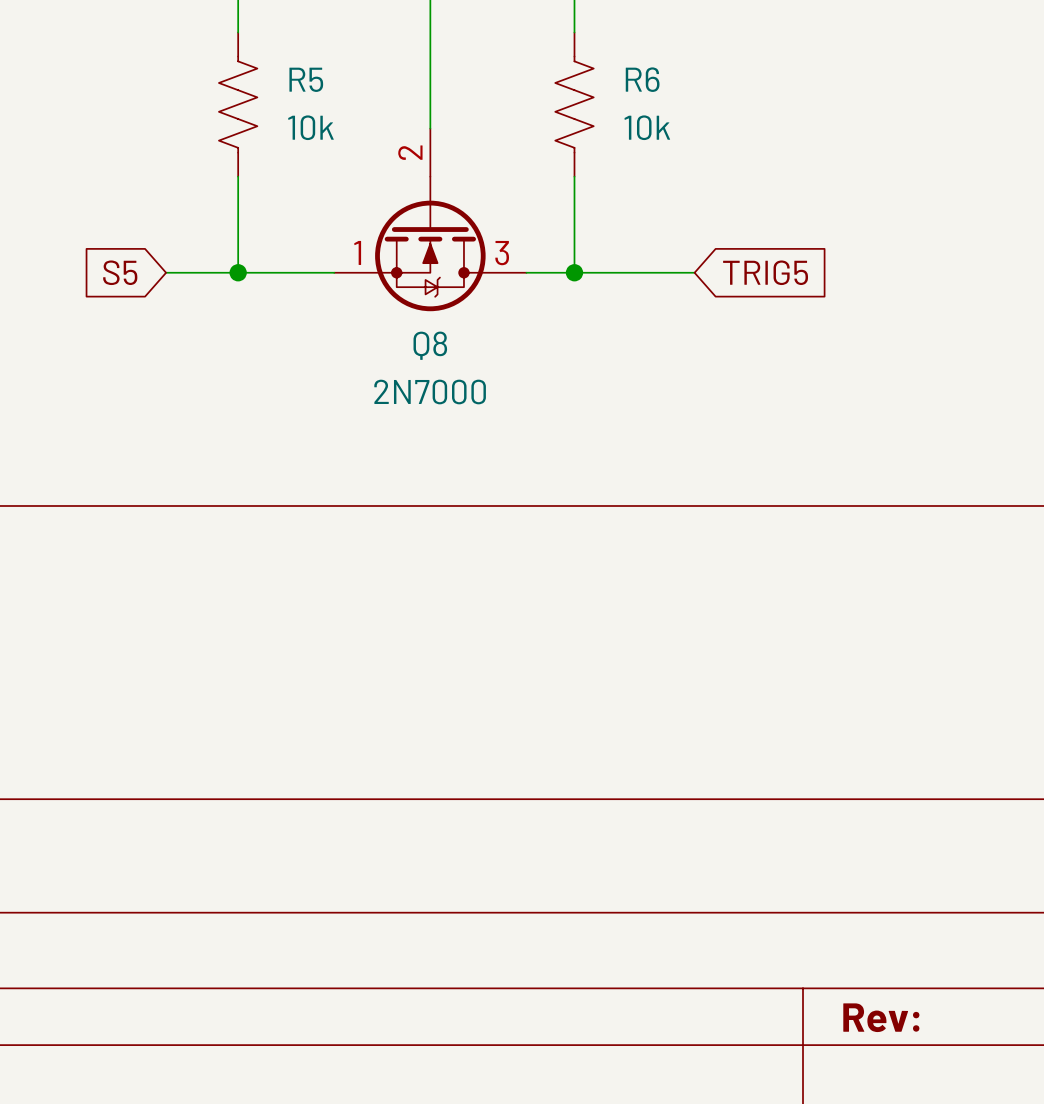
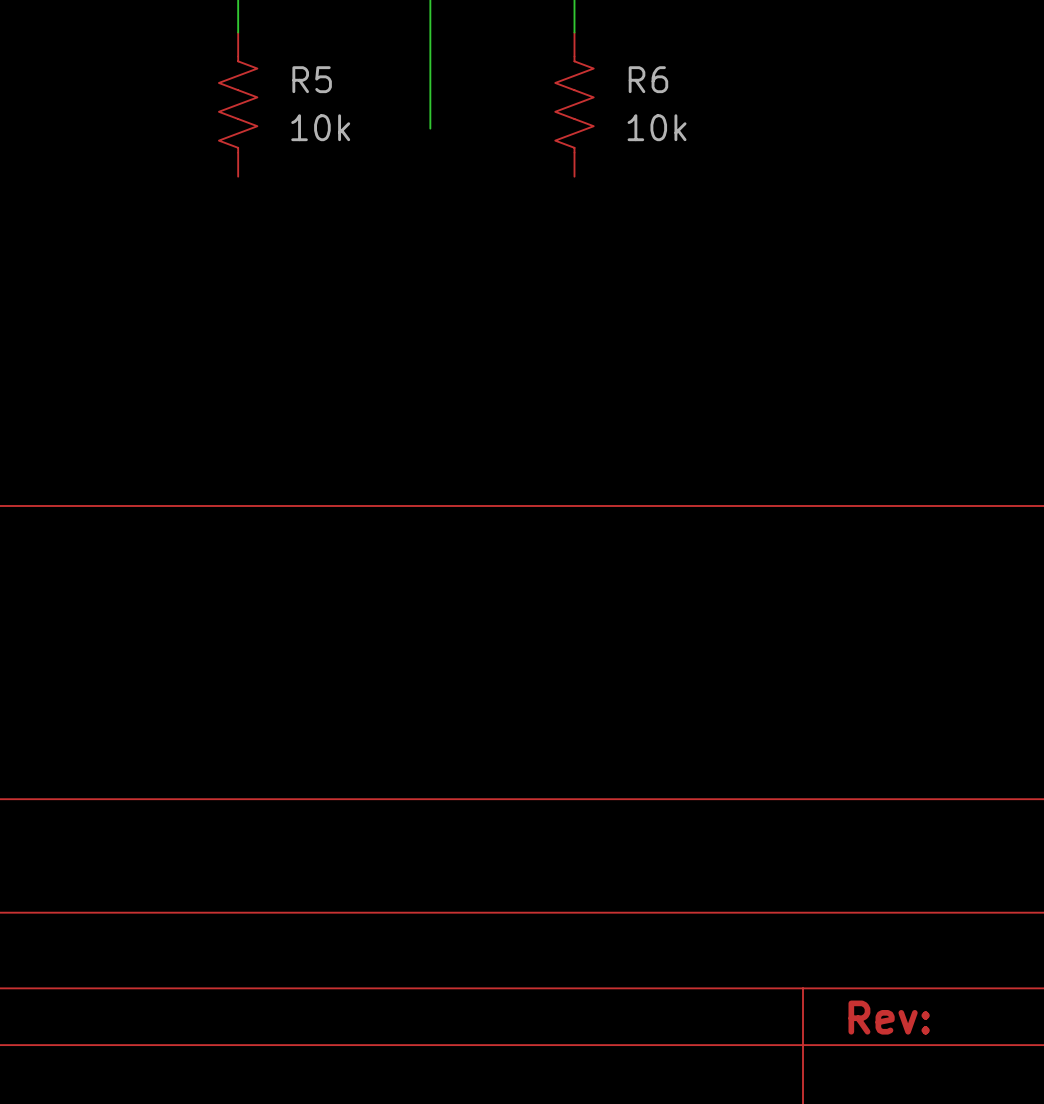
wire: (238, 176) (238, 272) -> none
wire: (574, 176) (574, 272) -> none
Q8: 2N7000 (430, 219) -> none
global label: S5 (120, 272) -> none
wire: (166, 272) (334, 272) -> none
junction: (238, 272) -> none
wire: (526, 272) (694, 272) -> none
junction: (574, 272) -> none
global label: TRIG5 (765, 272) -> none

